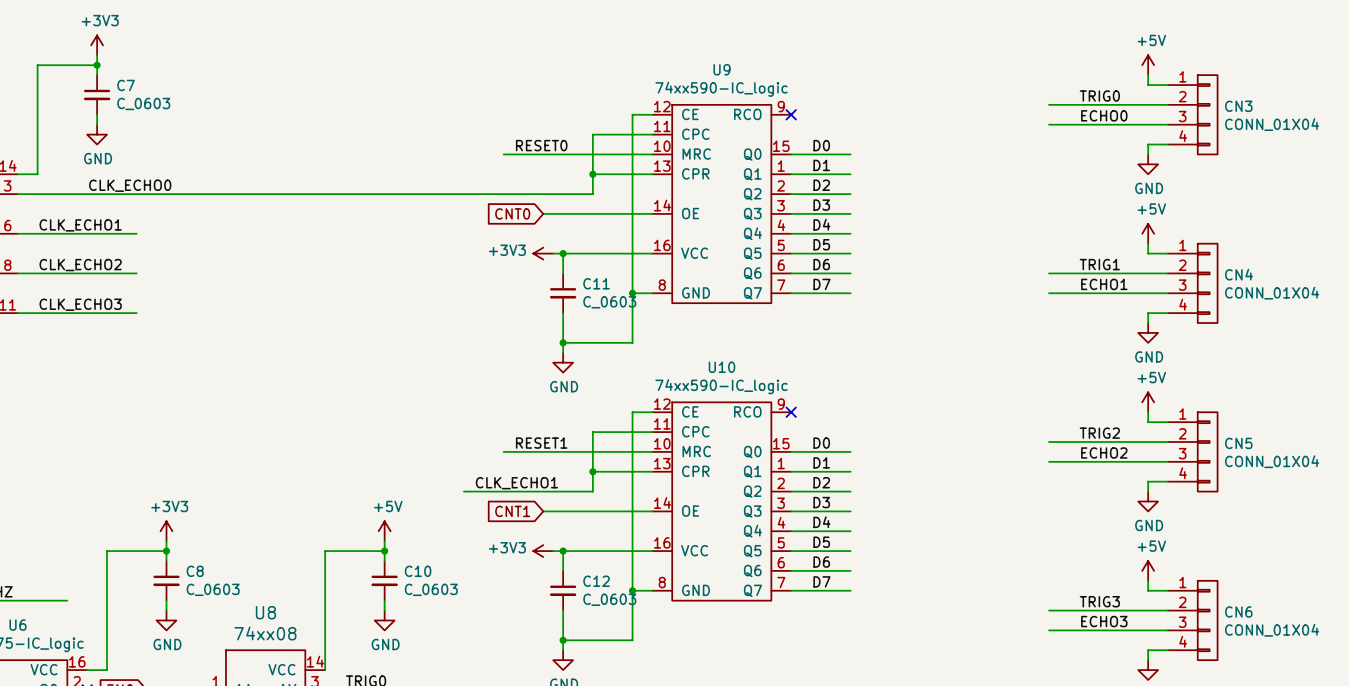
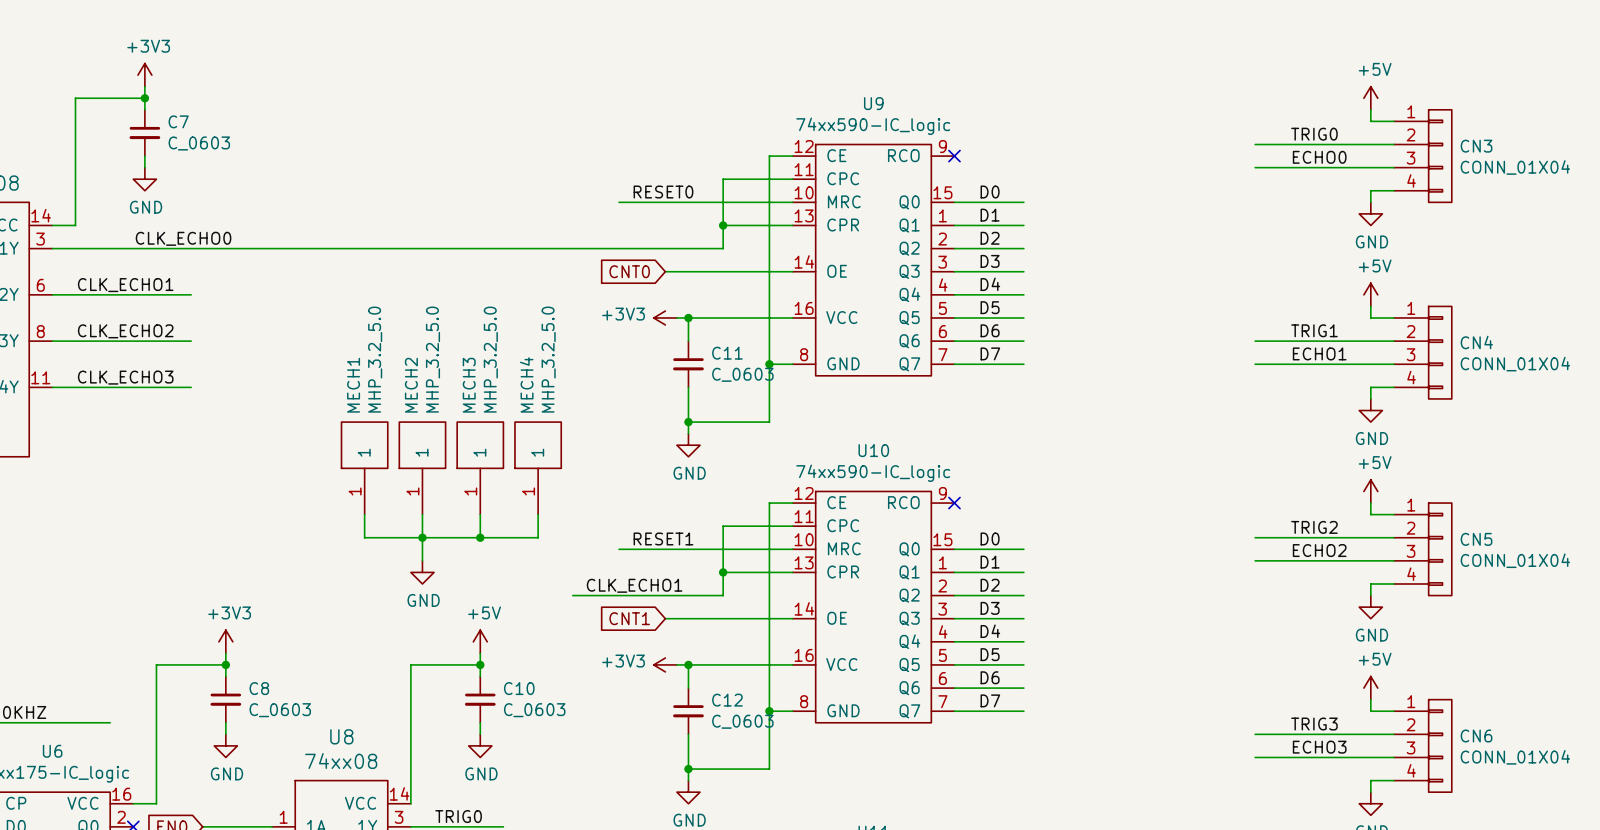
MECH1: none -> MHP_3.2_5.0 (364, 468)
MECH2: none -> MHP_3.2_5.0 (422, 468)
MECH3: none -> MHP_3.2_5.0 (480, 468)
MECH4: none -> MHP_3.2_5.0 (538, 468)
wire: none -> (364, 514) (364, 537) (538, 537) (538, 514)
wire: none -> (422, 514) (422, 560)
wire: none -> (480, 514) (480, 537)
junction: none -> (422, 537)
junction: none -> (480, 537)
power symbol: none -> GND (422, 572)

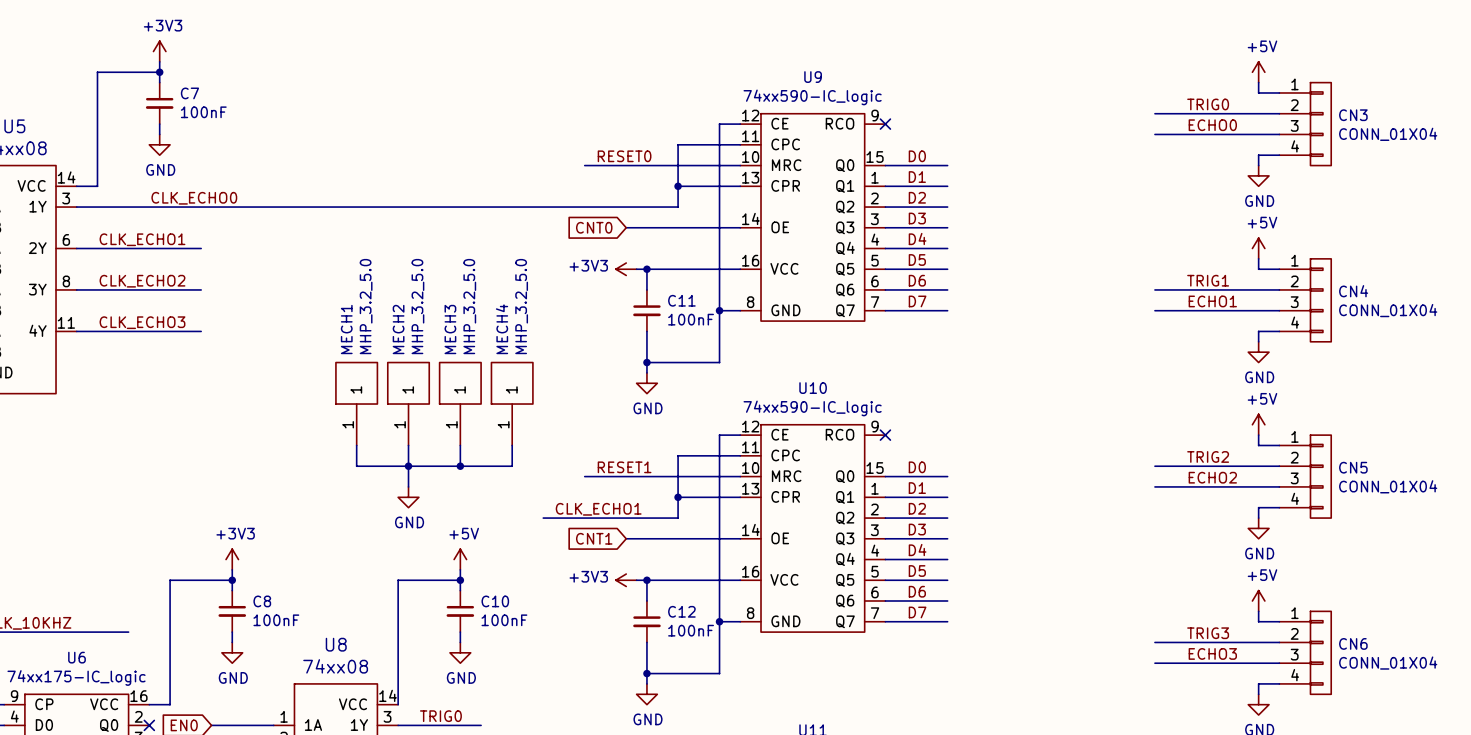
C7 value: C_0603 (199, 143) -> 100nF (203, 112)
C11 value: C_0603 (742, 374) -> 100nF (691, 319)
C8 value: C_0603 (280, 710) -> 100nF (276, 620)
C10 value: C_0603 (534, 710) -> 100nF (504, 620)
C12 value: C_0603 (742, 721) -> 100nF (691, 630)

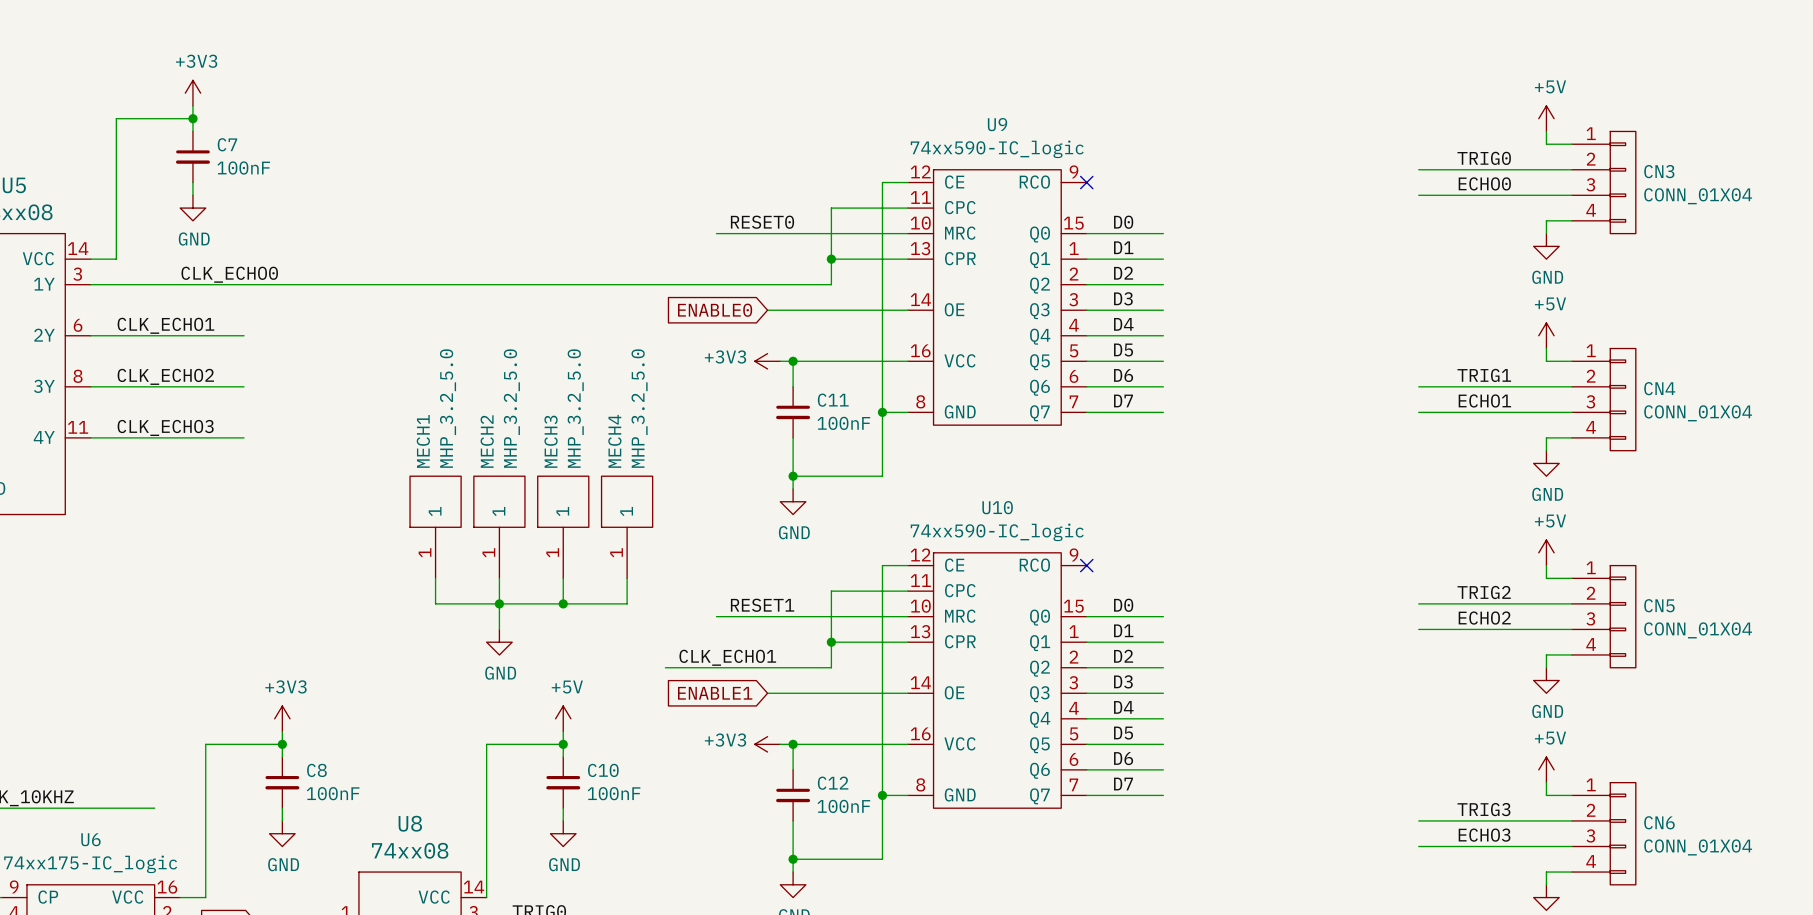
global label: CNT0 (594, 227) -> ENABLE0 (715, 310)
global label: CNT1 (594, 538) -> ENABLE1 (715, 693)

